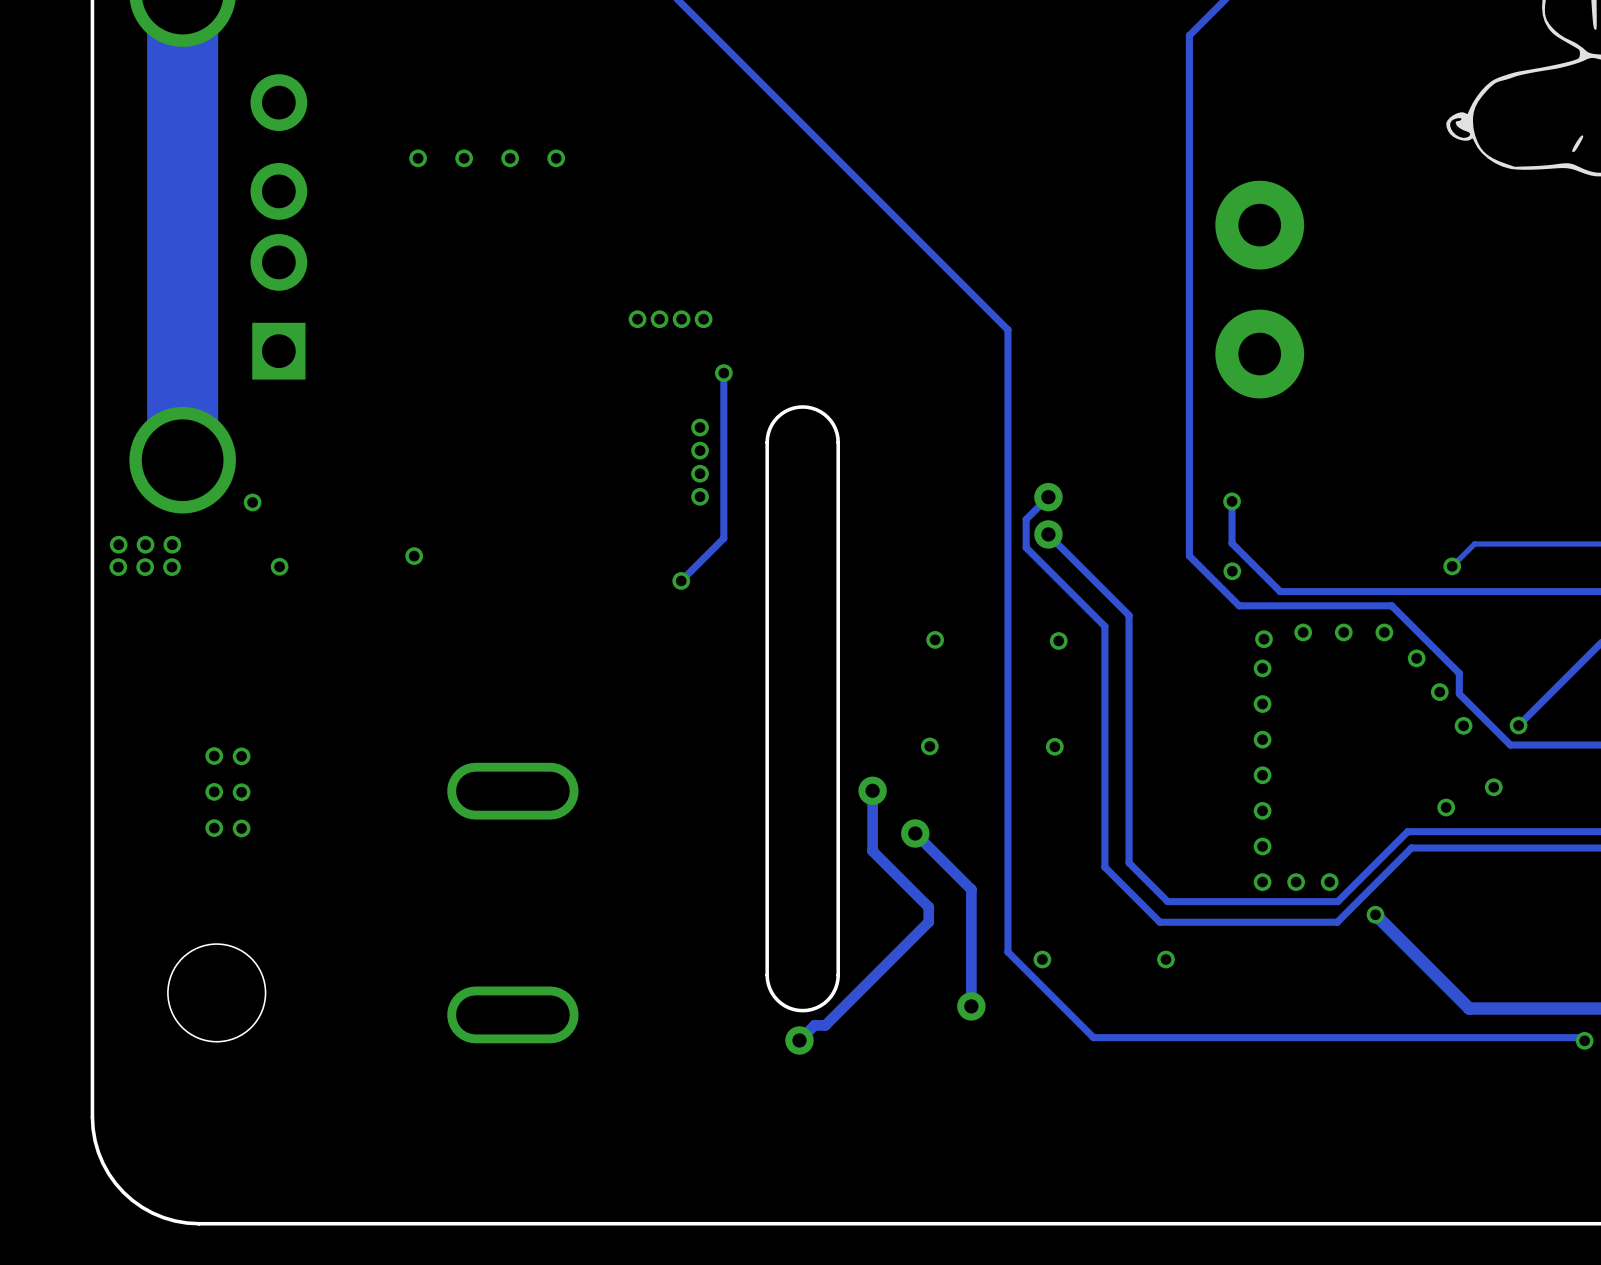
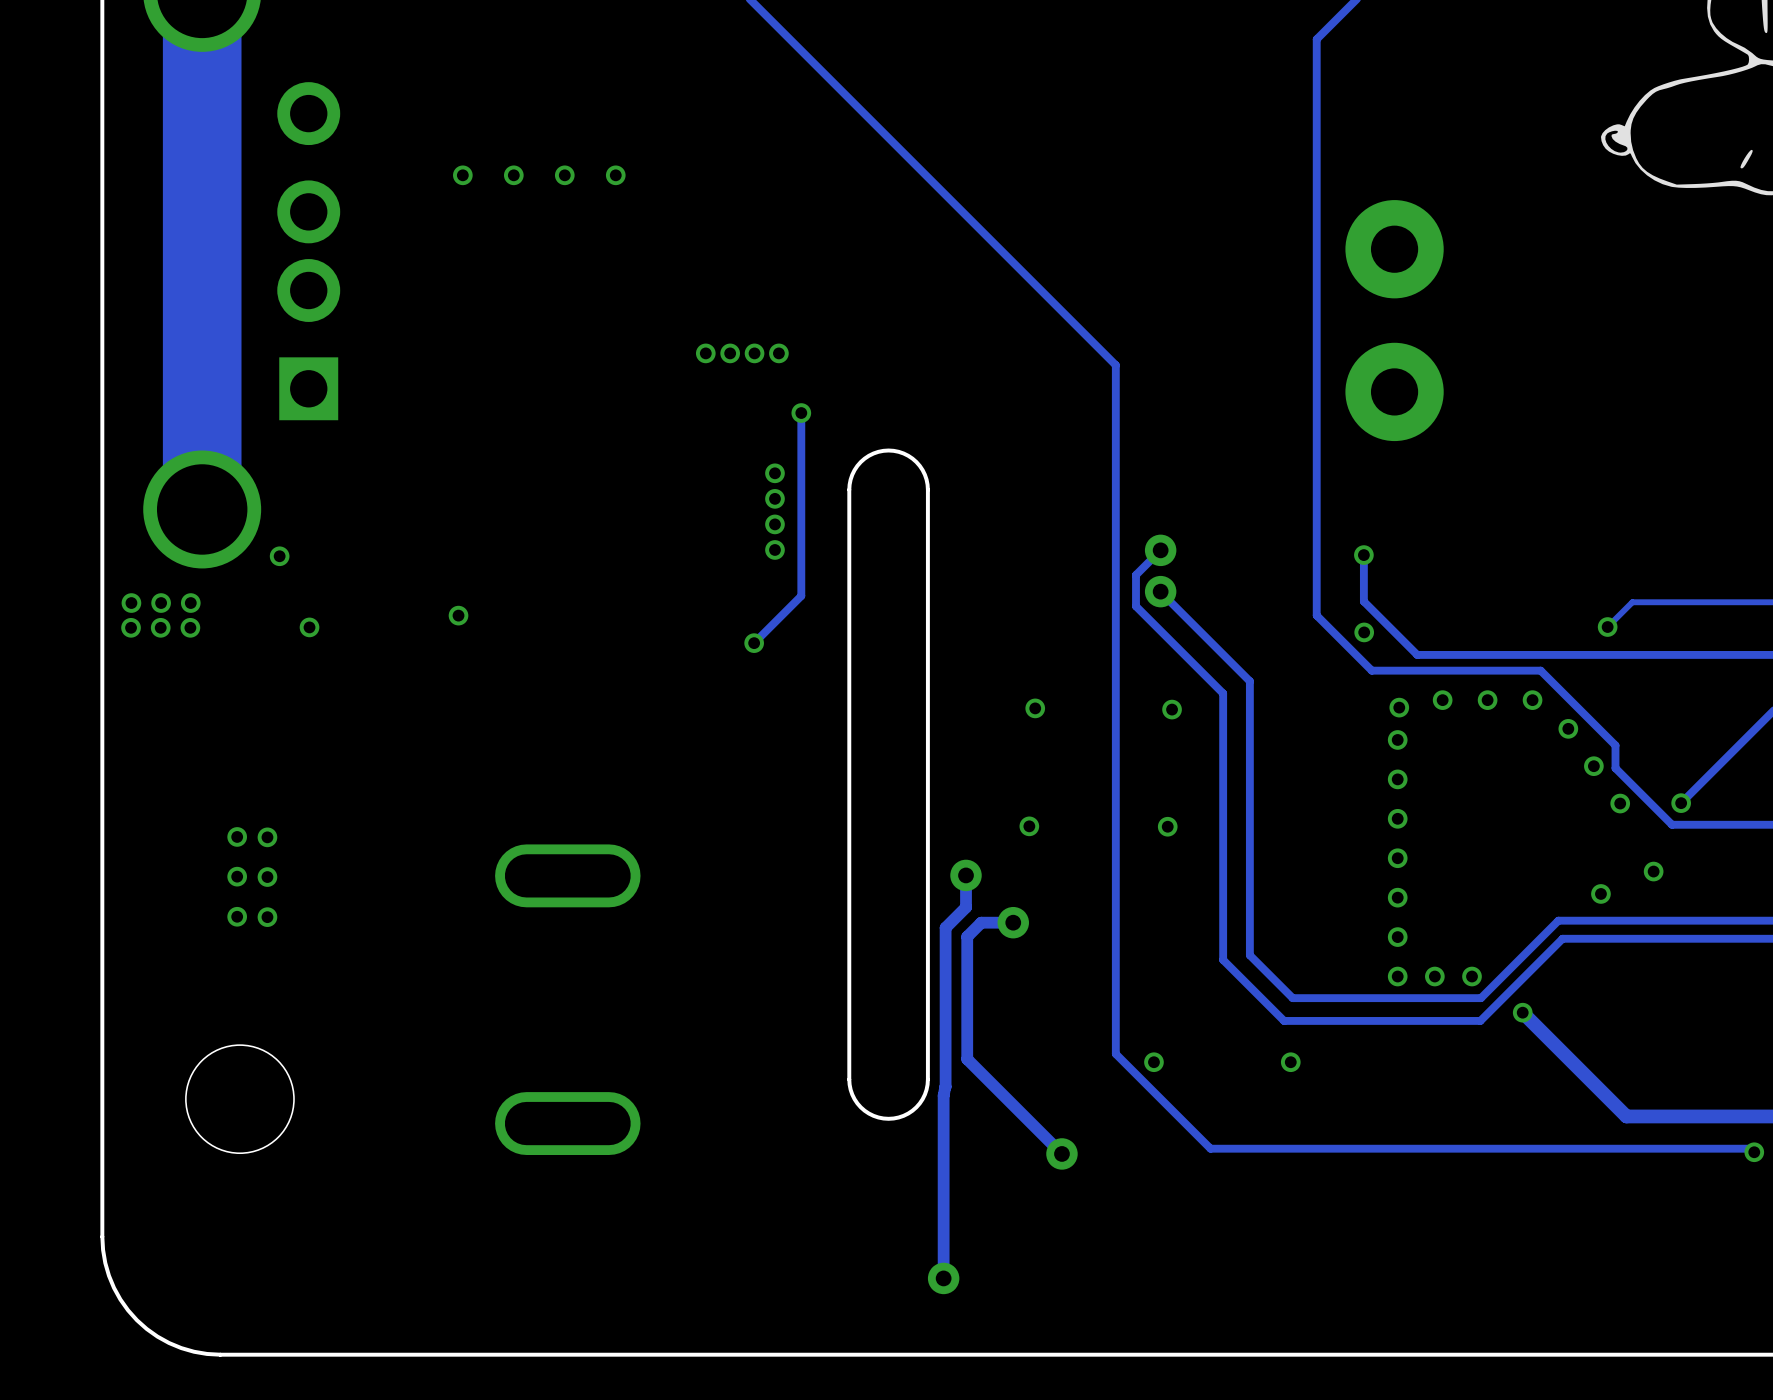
track: (872, 819) (872, 851) (928, 907) (928, 922) (825, 1025) (814, 1025) (799, 1040) -> (966, 907) (945, 927) (945, 1086)
track: (915, 833) (971, 889) (971, 1006) -> (1013, 922) (981, 922) (967, 936) (967, 1059) (1061, 1153)
track: none -> (945, 1087) (943, 1095) (943, 1278)
via position: (971, 1006) -> (1061, 1153)
via: (799, 1040) -> none
via: none -> (943, 1278)

